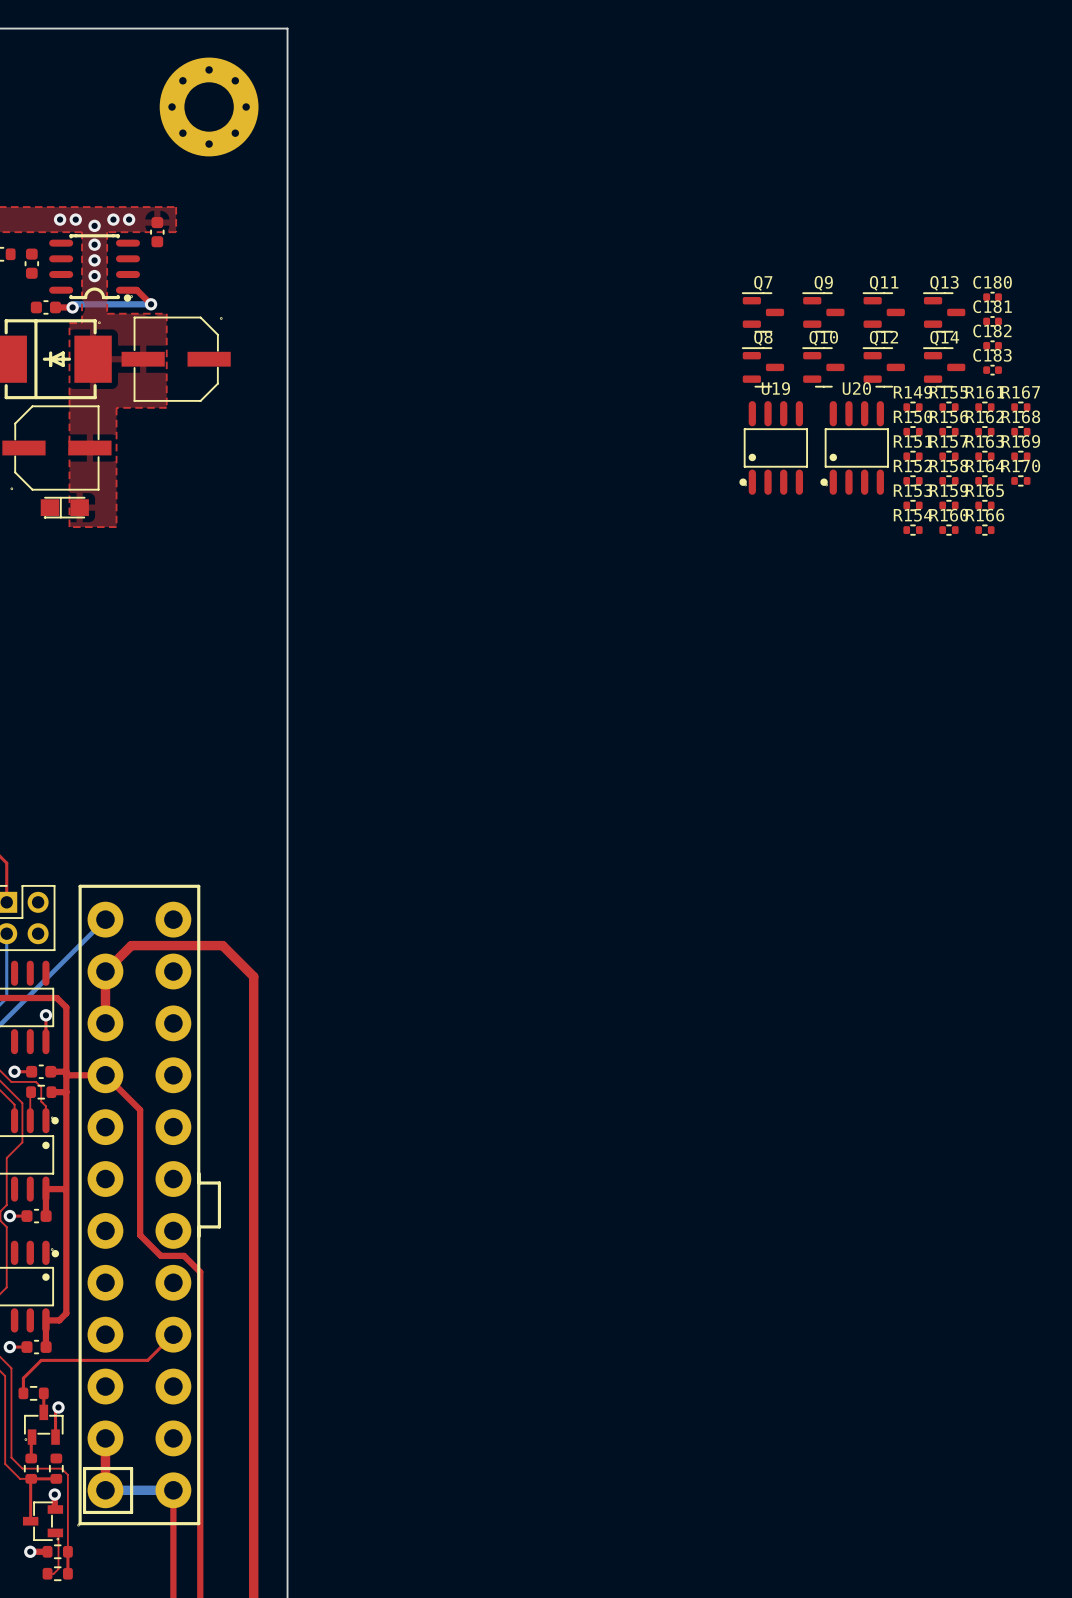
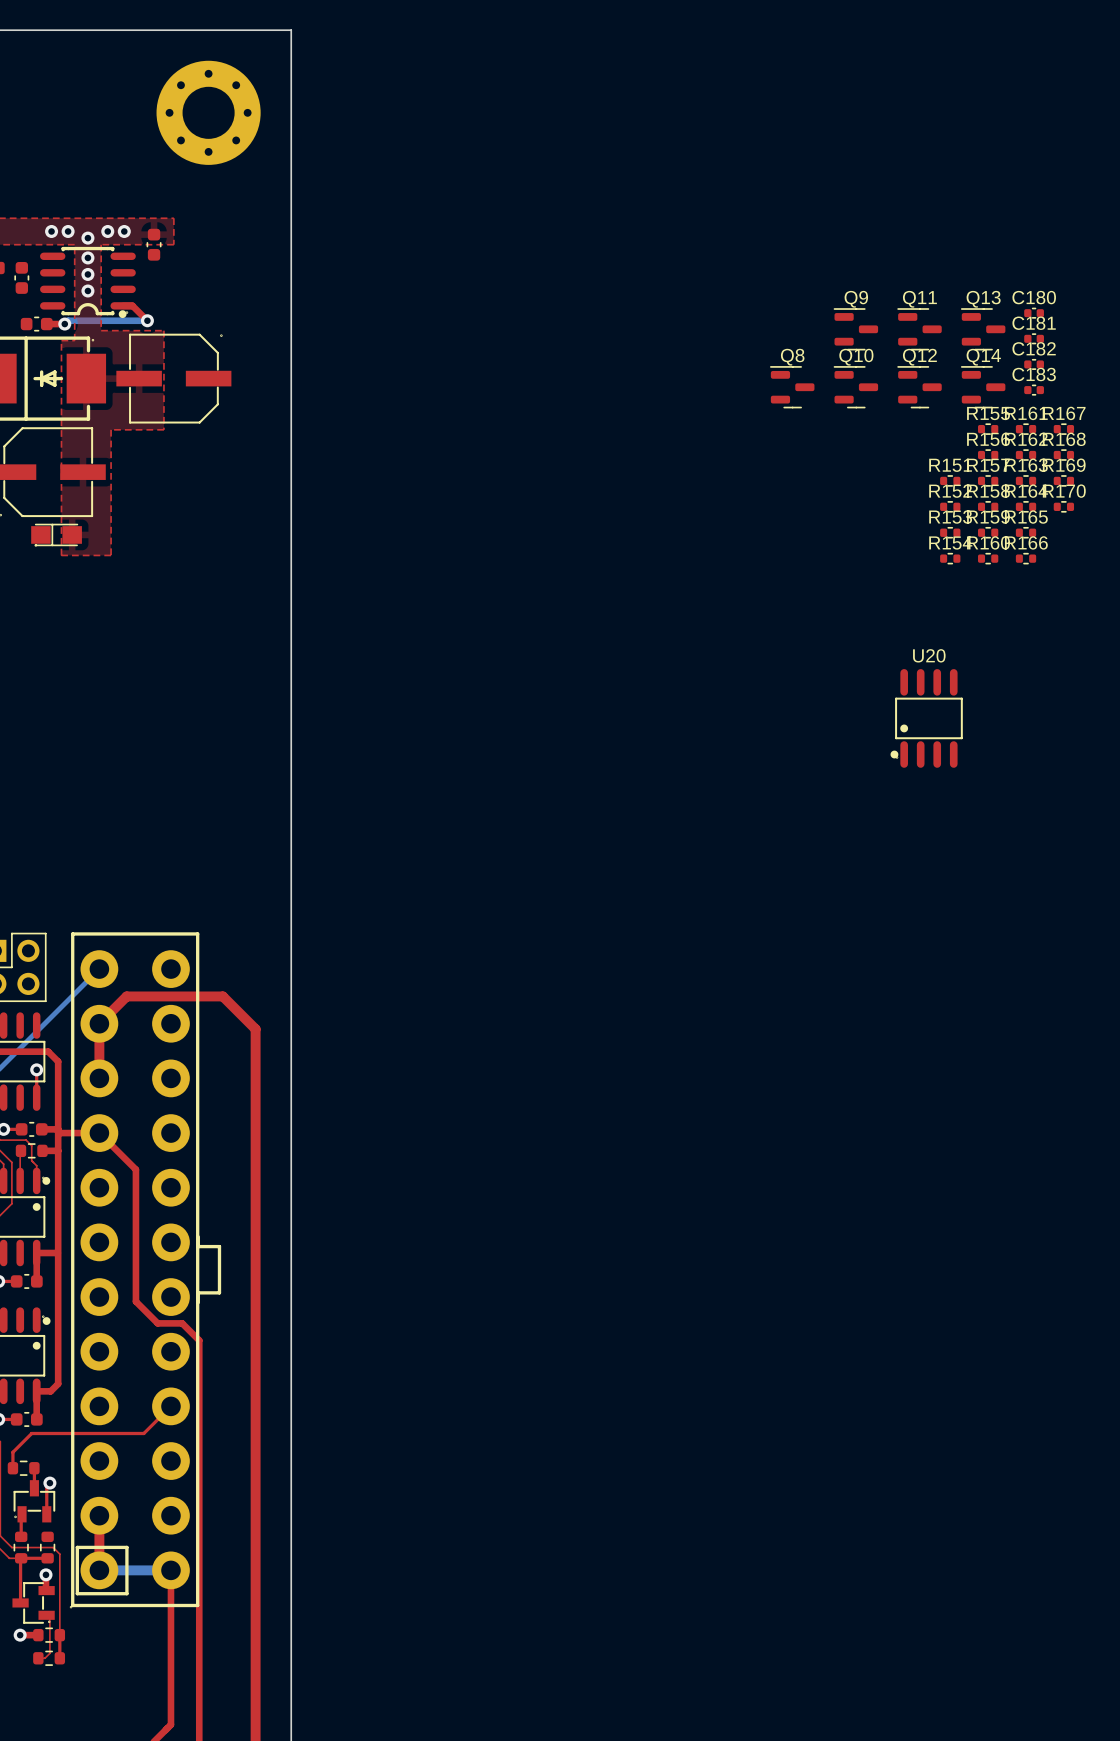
Q7: (763, 312) -> none
R149: (913, 407) -> none
R150: (913, 431) -> none
U19: (773, 447) -> none
U20 position: (854, 447) -> (926, 718)

